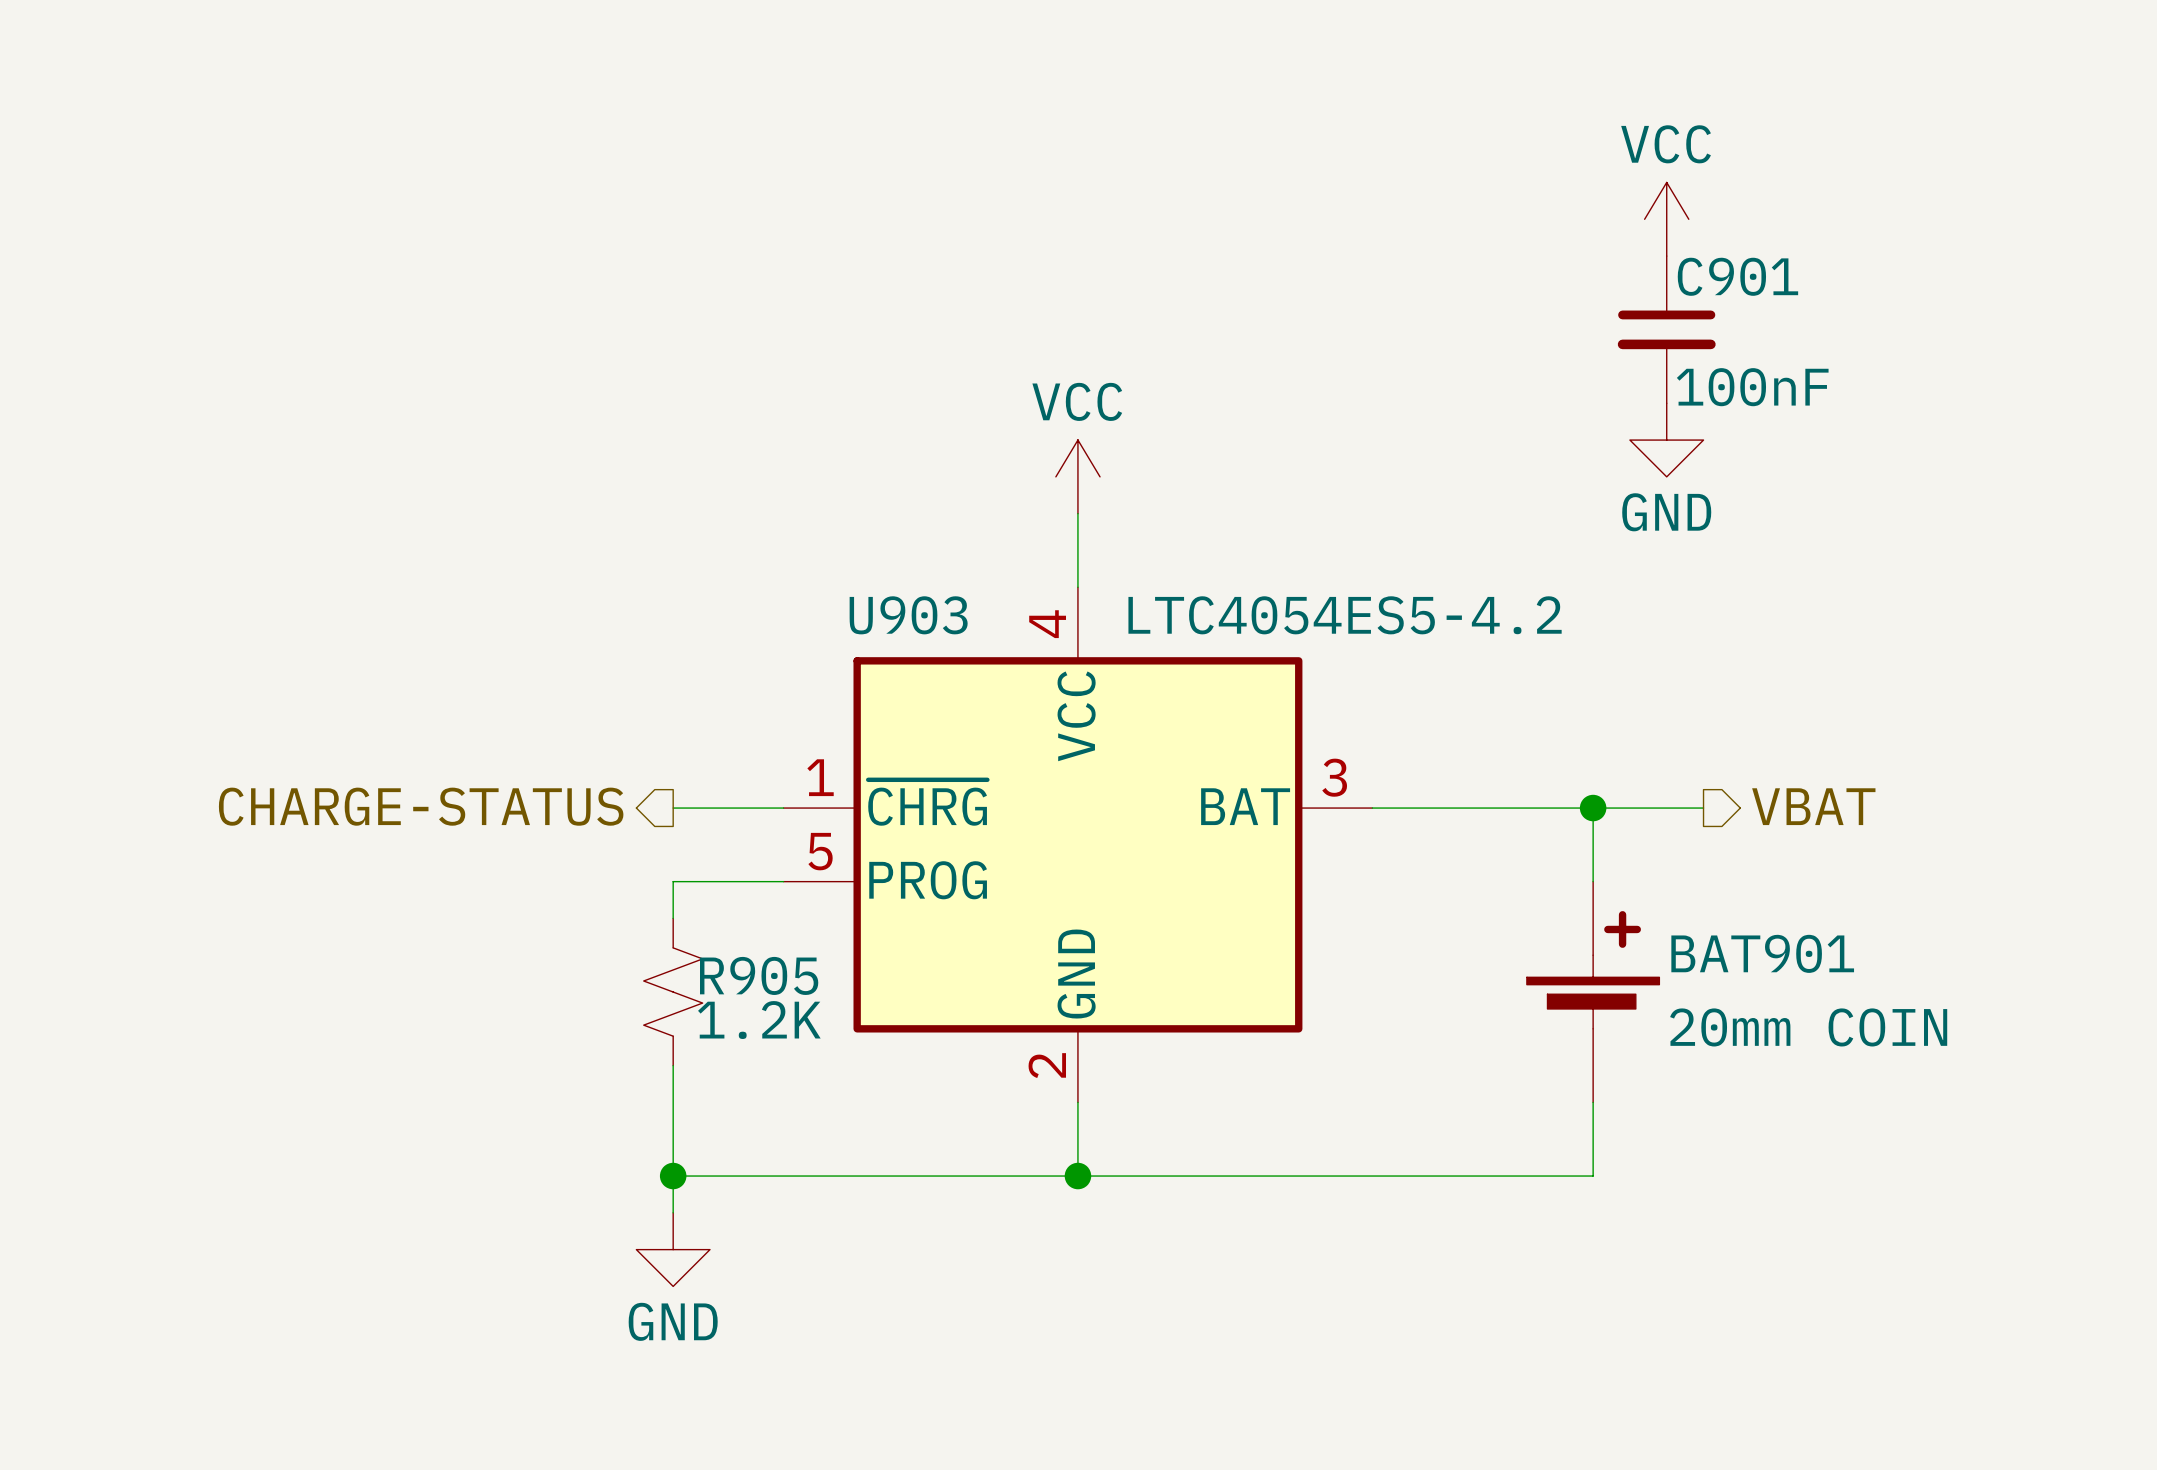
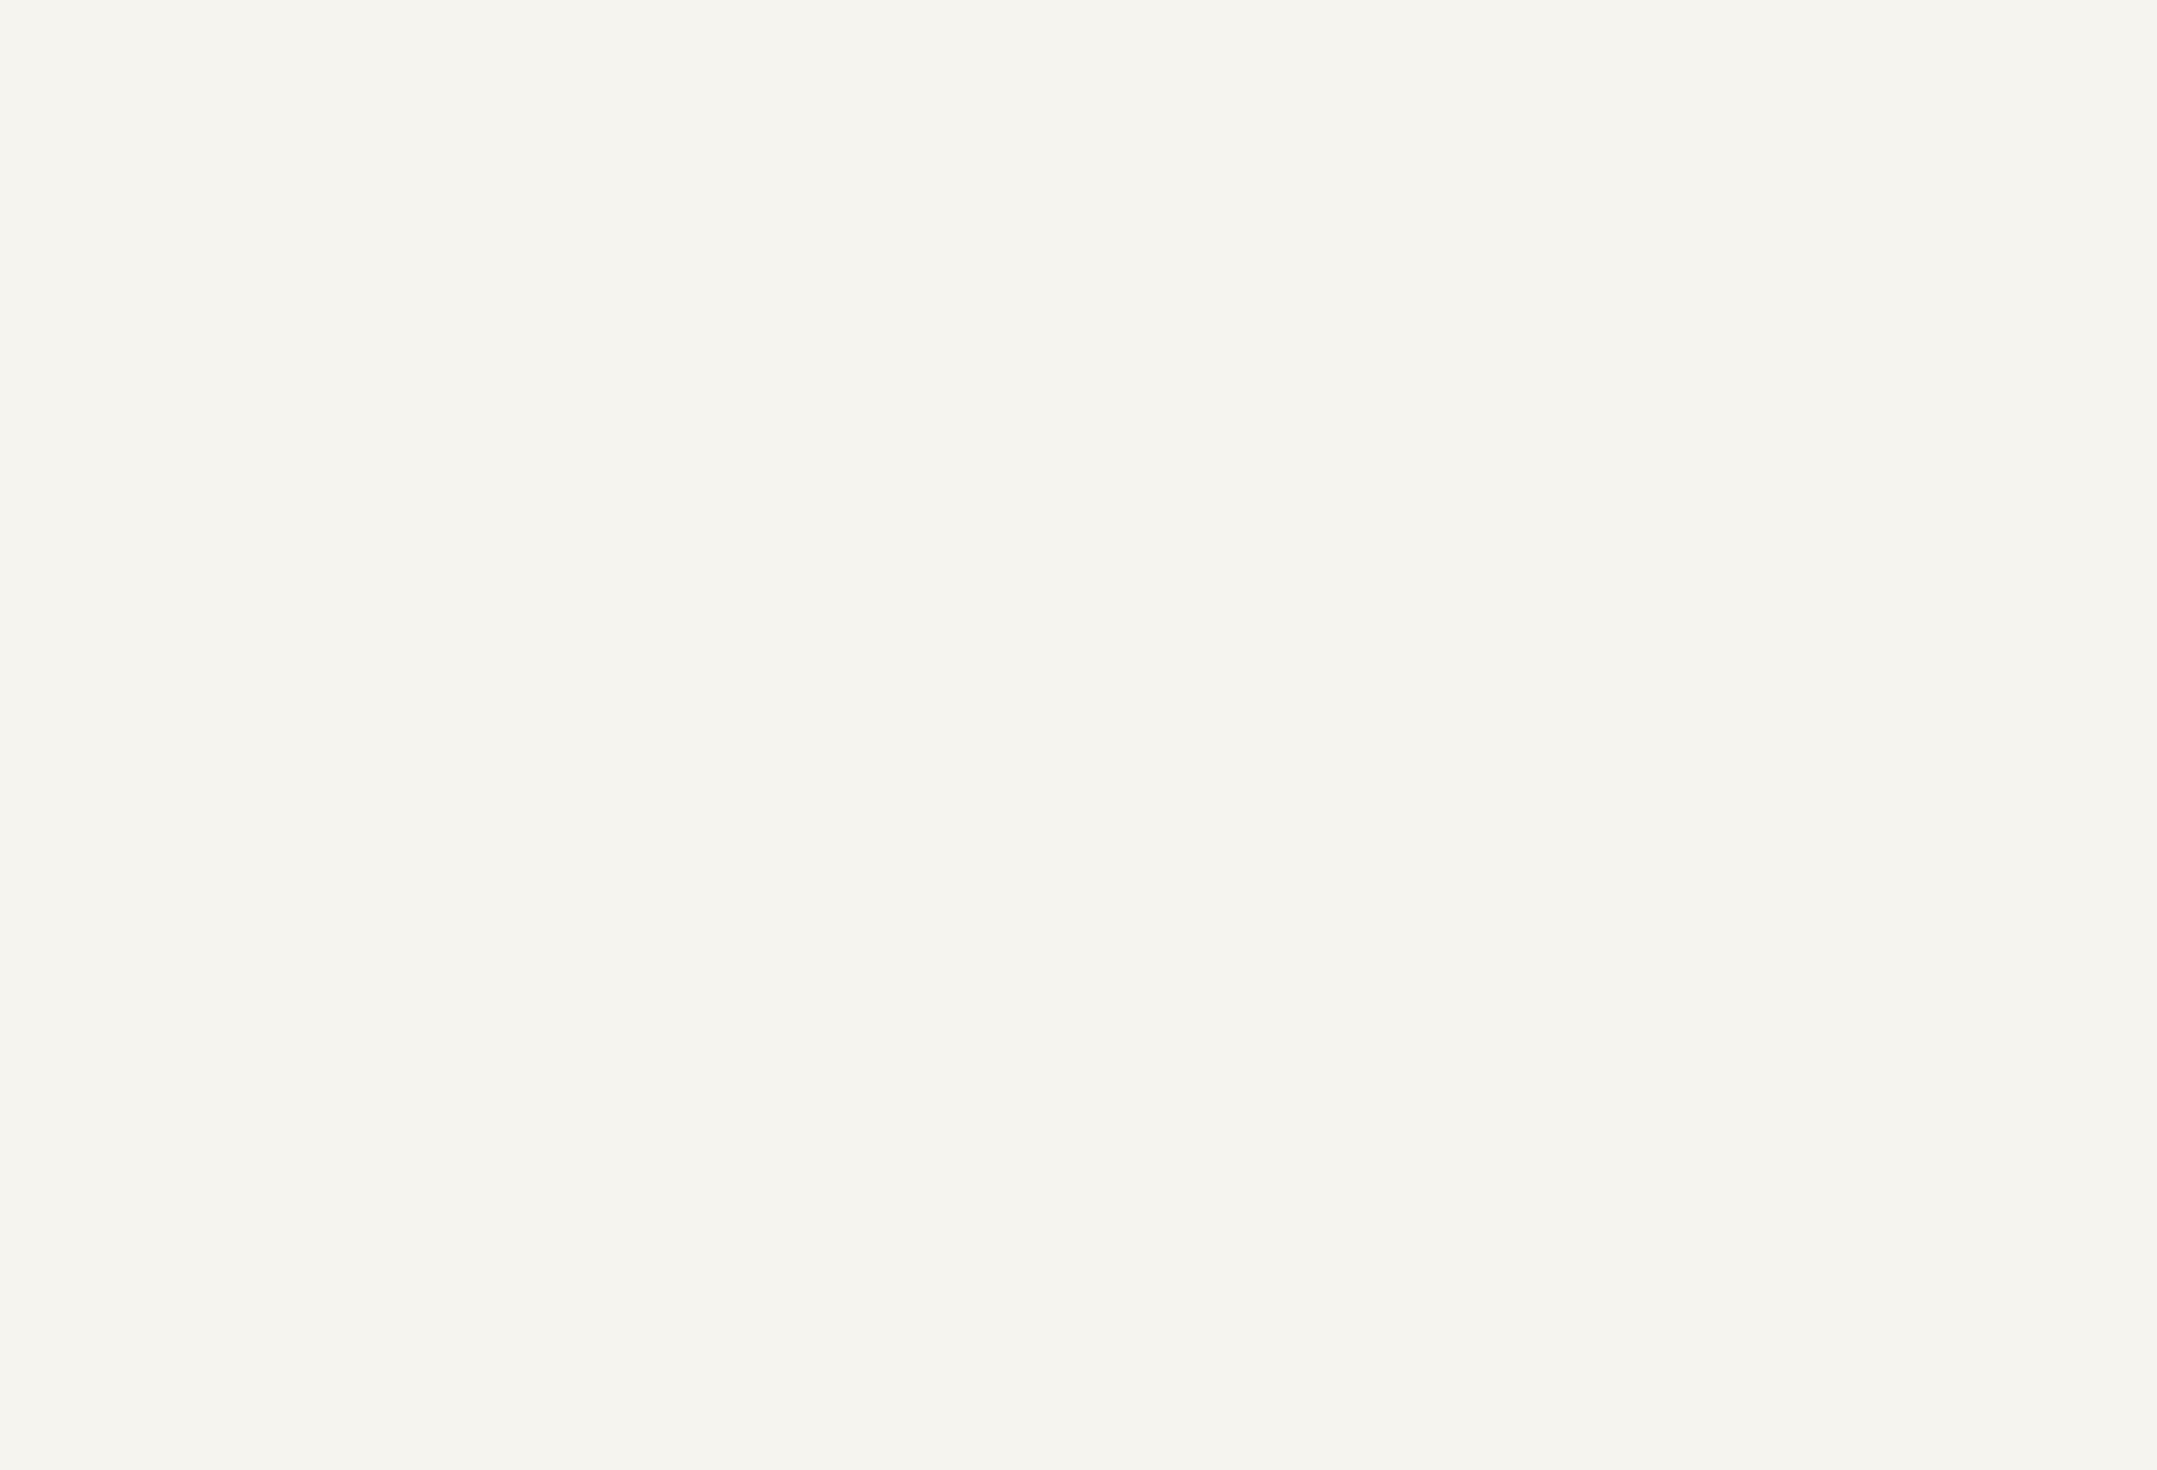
power symbol: VCC (1666, 219) -> none
C901: 100nF (1666, 329) -> none
power symbol: GND (1666, 440) -> none
power symbol: VCC (1077, 476) -> none
wire: (1077, 513) (1077, 587) -> none
hierarchical label: CHARGE-STATUS (421, 806) -> none
hierarchical label: VBAT (1813, 806) -> none
wire: (673, 808) (783, 808) -> none
wire: (1372, 808) (1703, 808) -> none
wire: (1593, 808) (1593, 881) -> none
junction: (1593, 808) -> none
U903: LTC4054ES5-4.2 (1077, 844) -> none
wire: (783, 881) (673, 881) (673, 918) -> none
R905: 1.2K (673, 992) -> none
BAT901: 20mm COIN (1593, 992) -> none
wire: (673, 1065) (673, 1212) -> none
wire: (1077, 1102) (1077, 1176) -> none
wire: (1593, 1102) (1593, 1176) (673, 1176) -> none
junction: (673, 1176) -> none
junction: (1077, 1176) -> none
power symbol: GND (673, 1249) -> none

